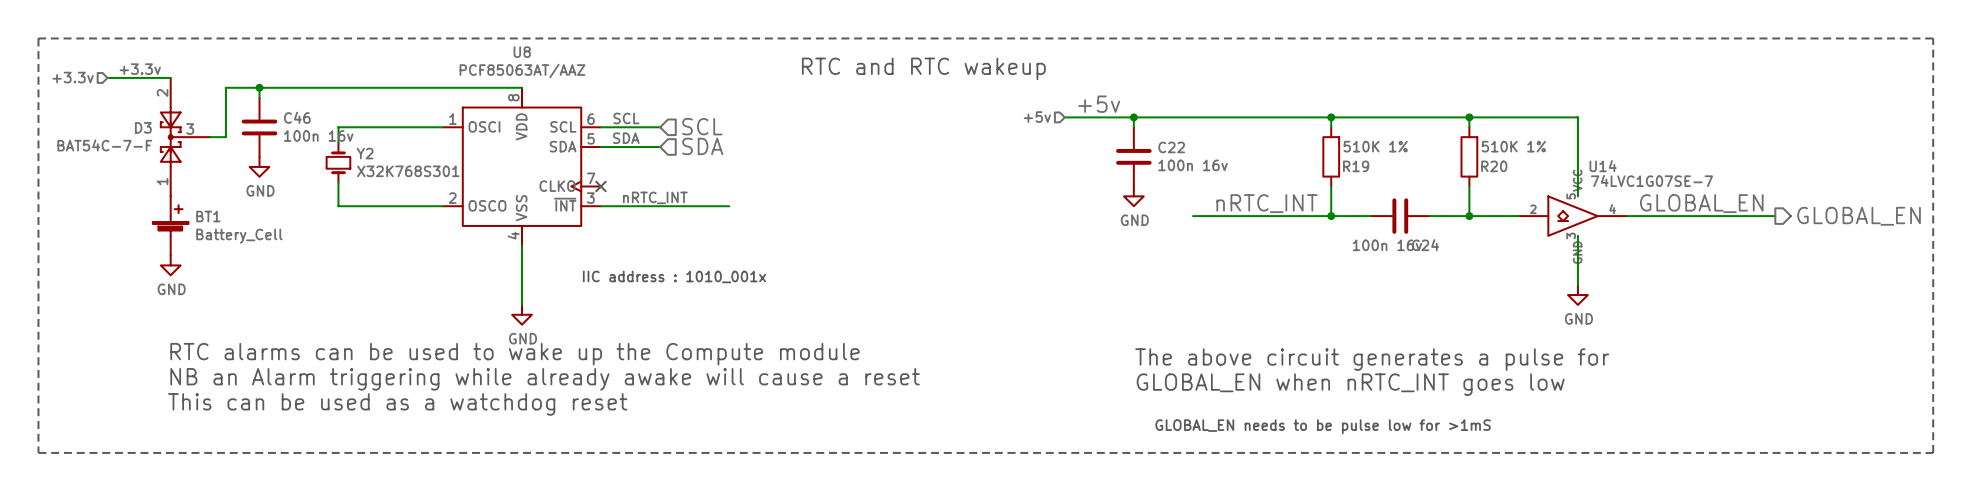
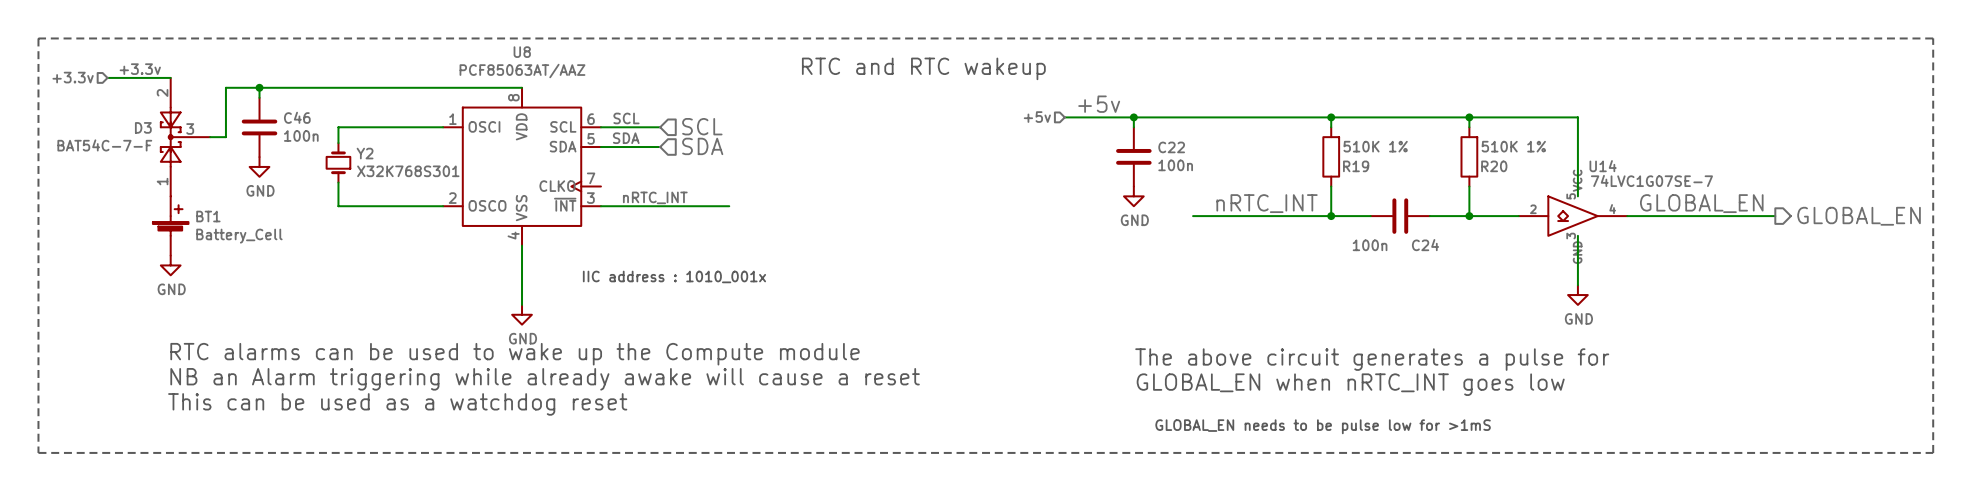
C46 value: 100n 16v (318, 135) -> 100n (301, 135)
C22 value: 100n 16v (1193, 165) -> 100n (1175, 165)
no-connect mark: (600, 186) -> none
C24 value: 100n 16v (1387, 245) -> 100n (1370, 245)

